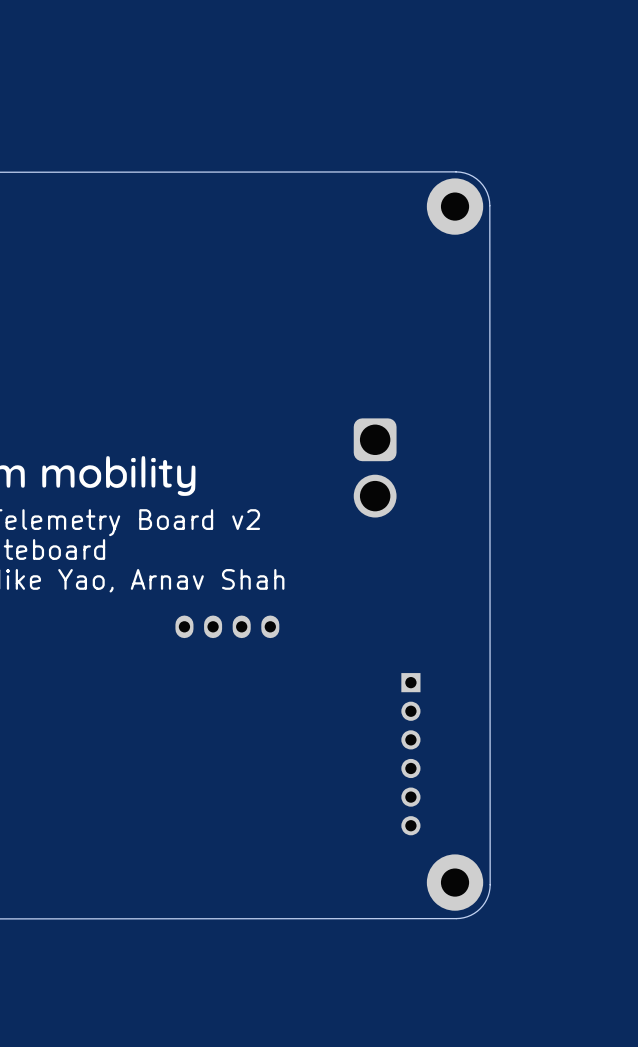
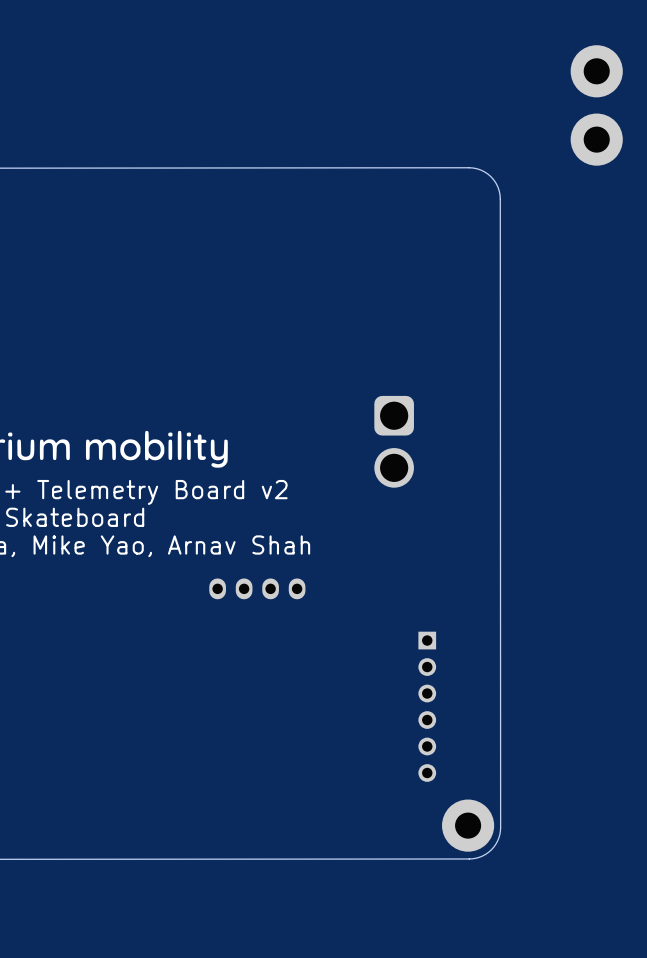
part: none -> (596, 71)
part: none -> (596, 139)
part: (455, 206) -> none

